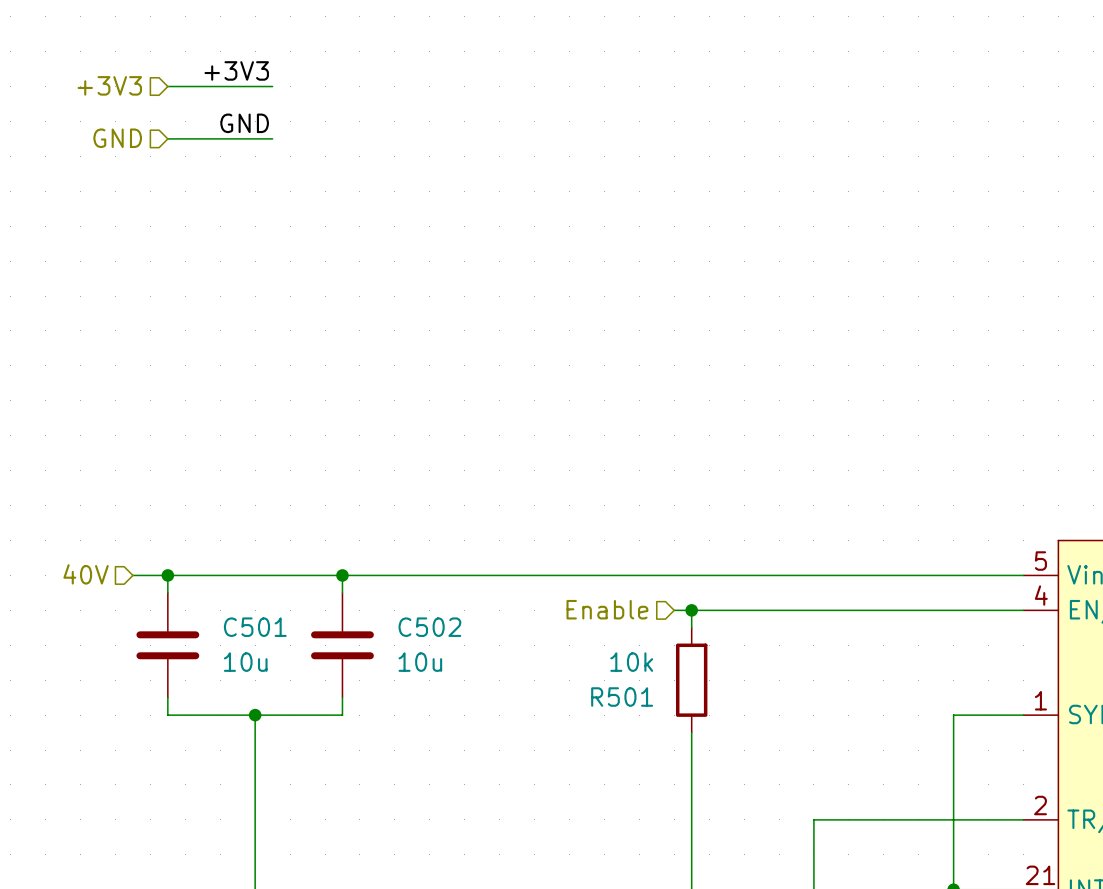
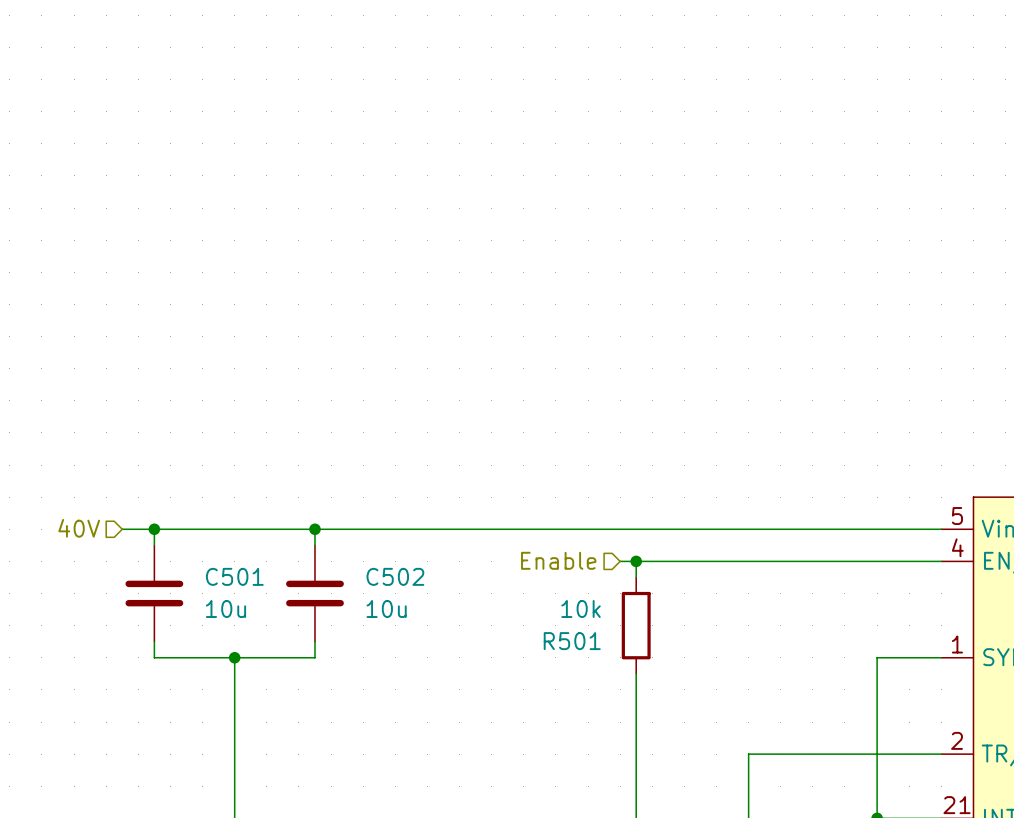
label: +3V3 (236, 70) -> none
hierarchical label: +3V3 (109, 85) -> none
wire: (167, 86) (272, 86) -> none
label: GND (244, 123) -> none
hierarchical label: GND (117, 138) -> none
wire: (167, 138) (272, 138) -> none

